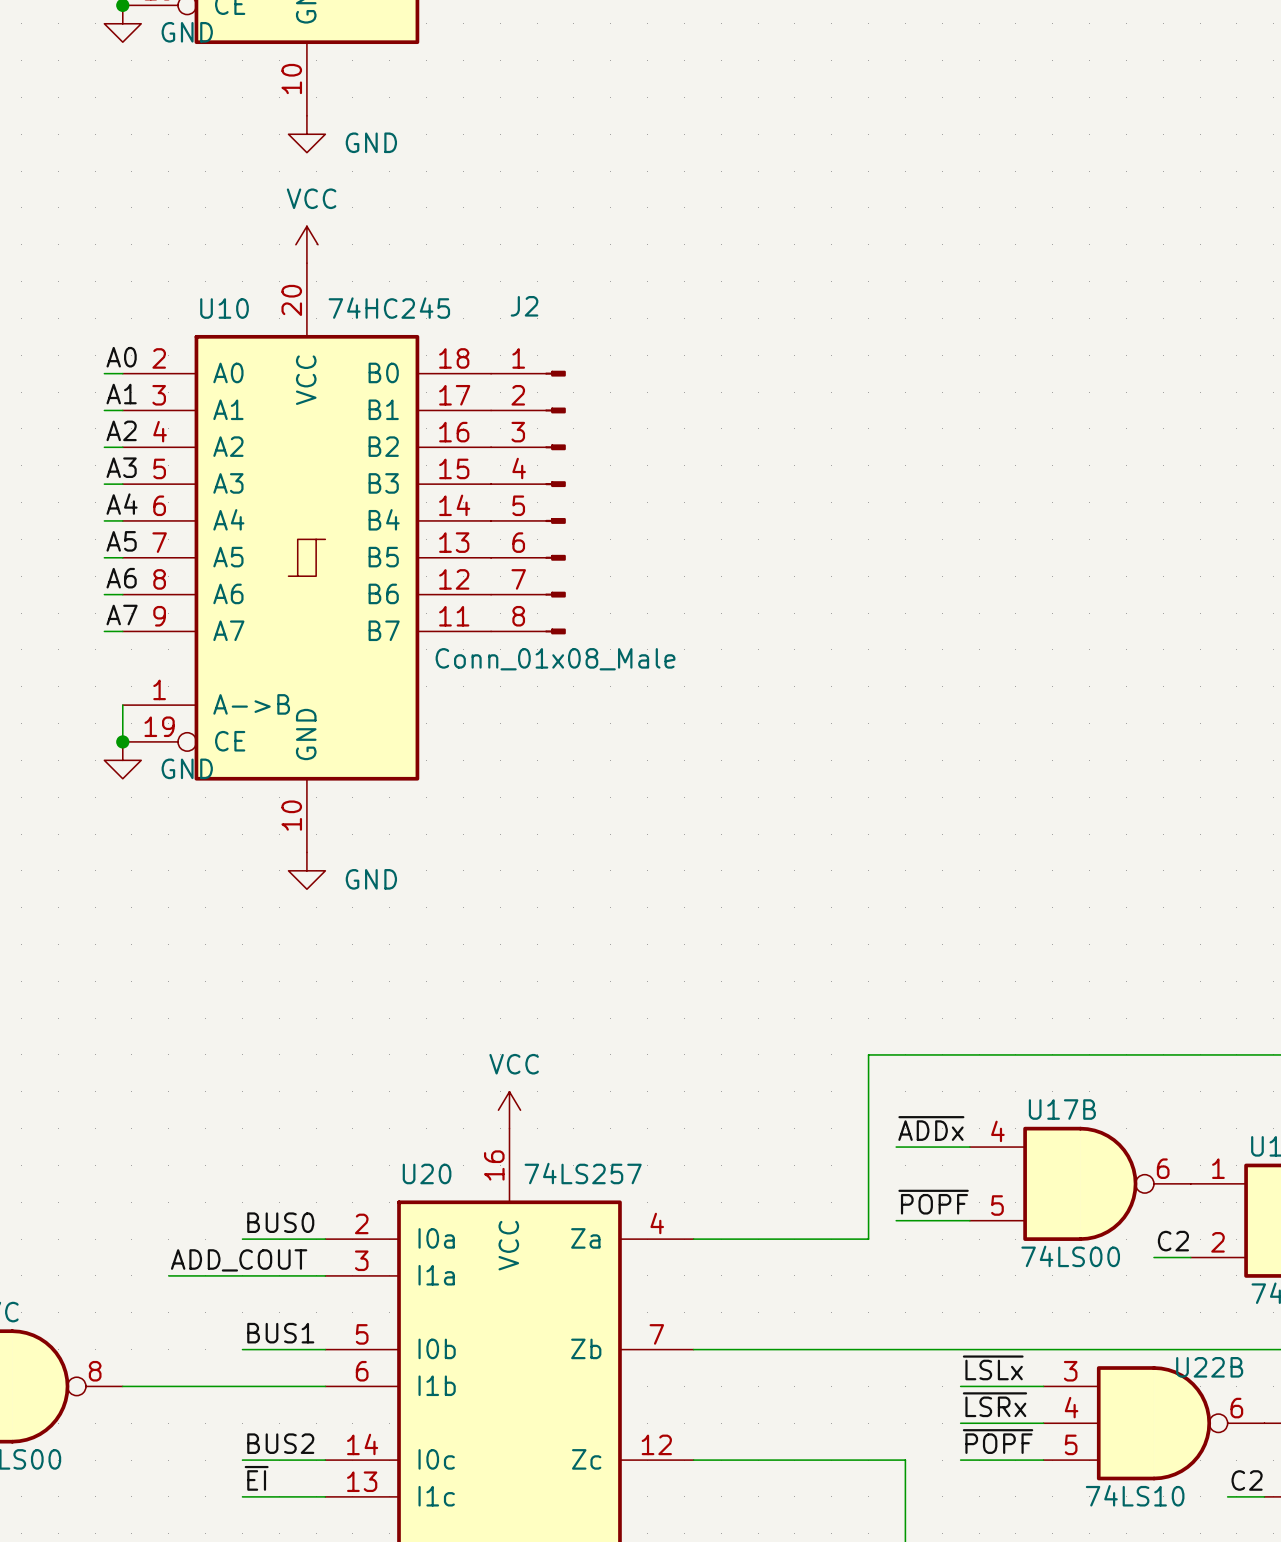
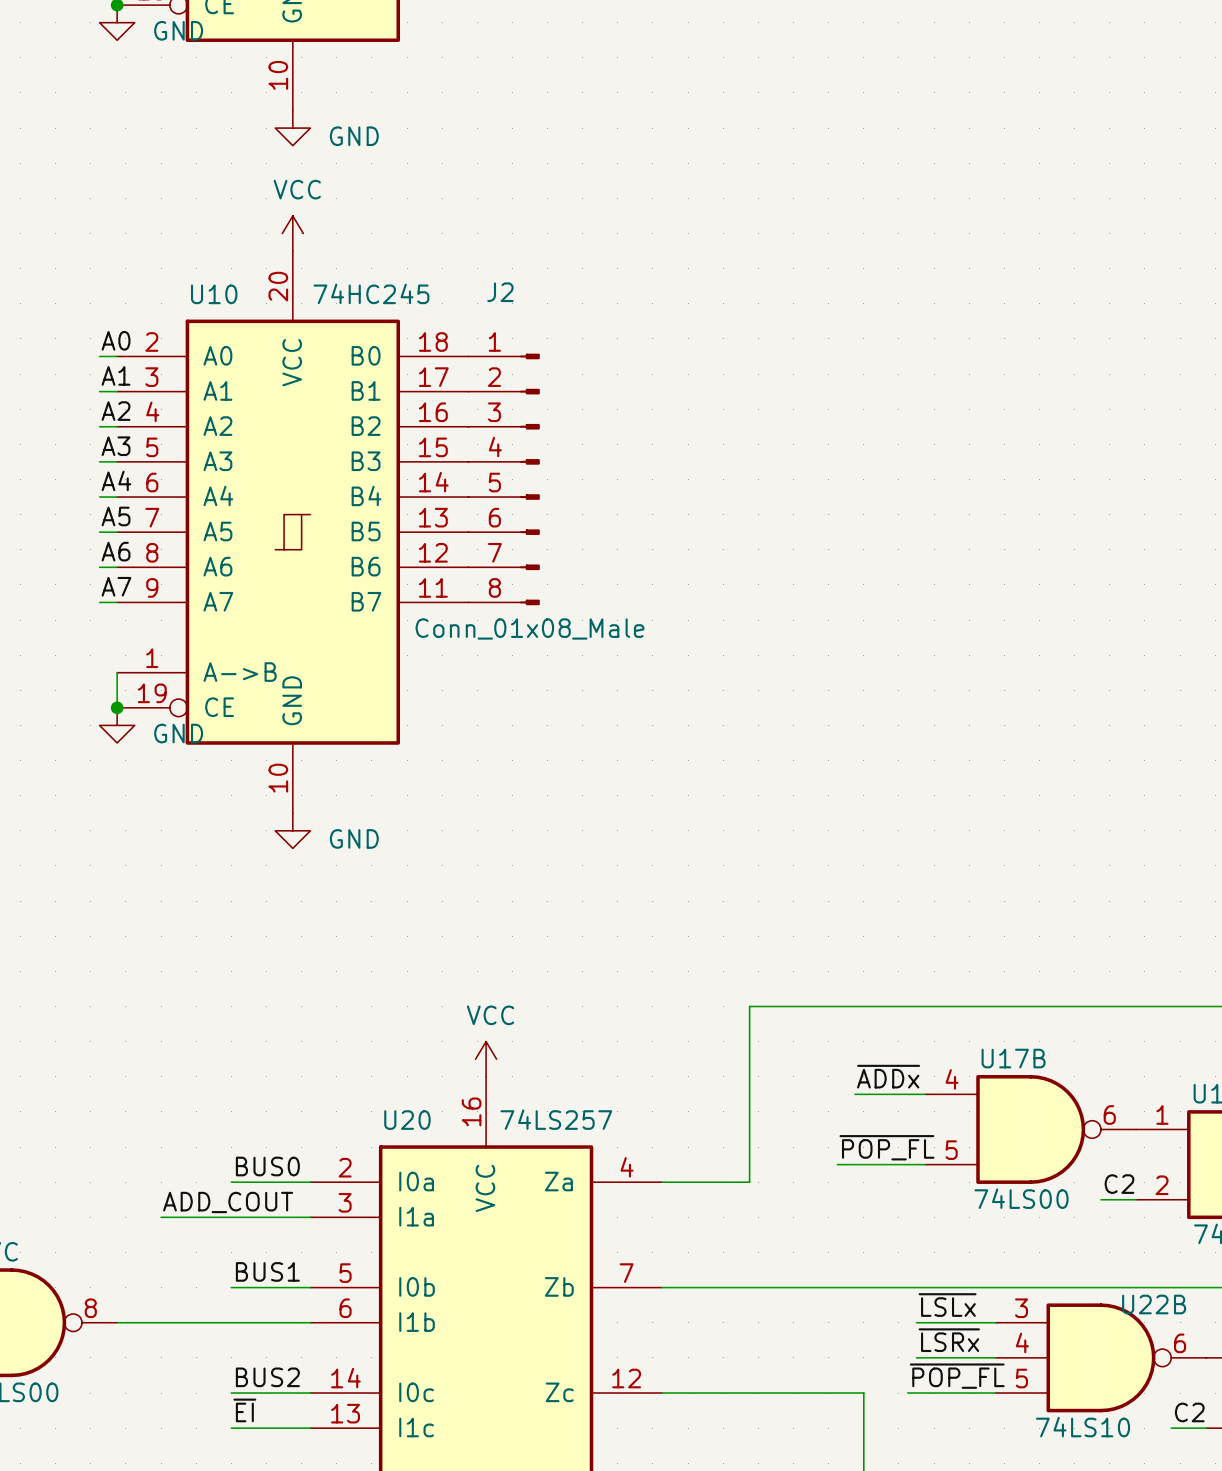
wire: (868, 1054) (868, 1239) (785, 1239) -> (828, 1006) (749, 1006) (749, 1182)
label: ~{POPF} (933, 1202) -> ~{POP_FL} (886, 1147)
wire: none -> (837, 1164) (855, 1164)
label: ~{POPF} (998, 1441) -> ~{POP_FL} (957, 1376)
wire: none -> (907, 1393) (916, 1393)

